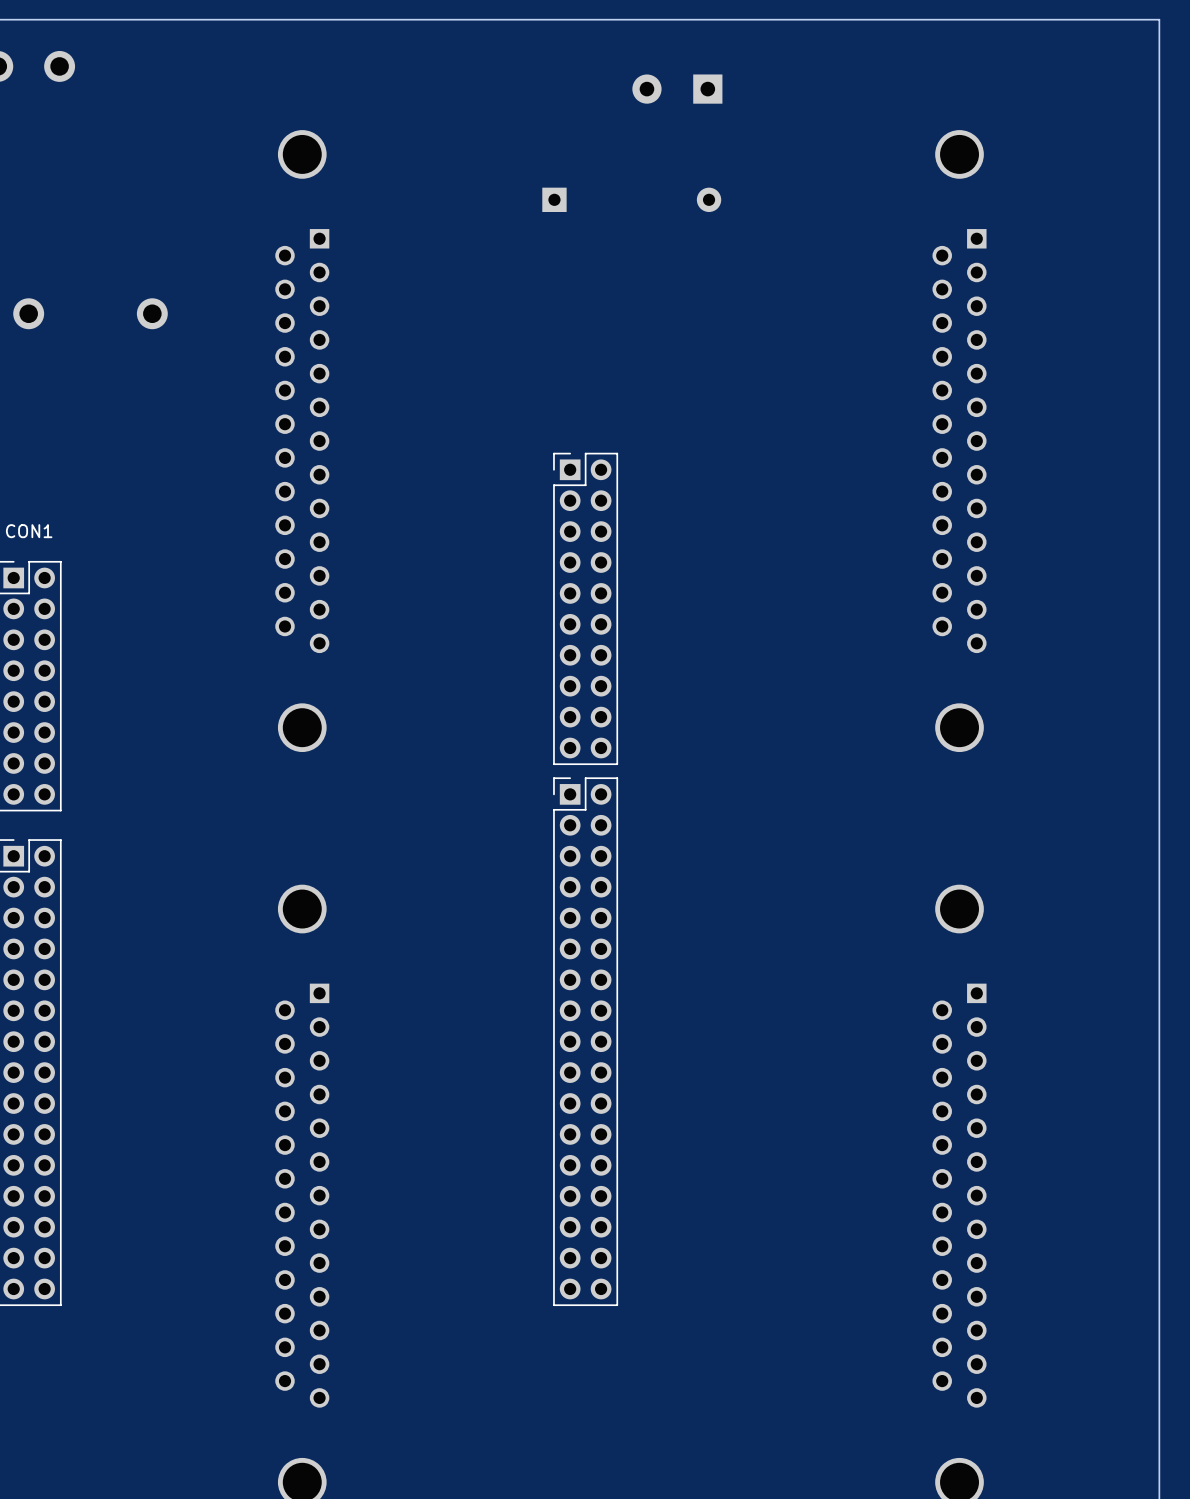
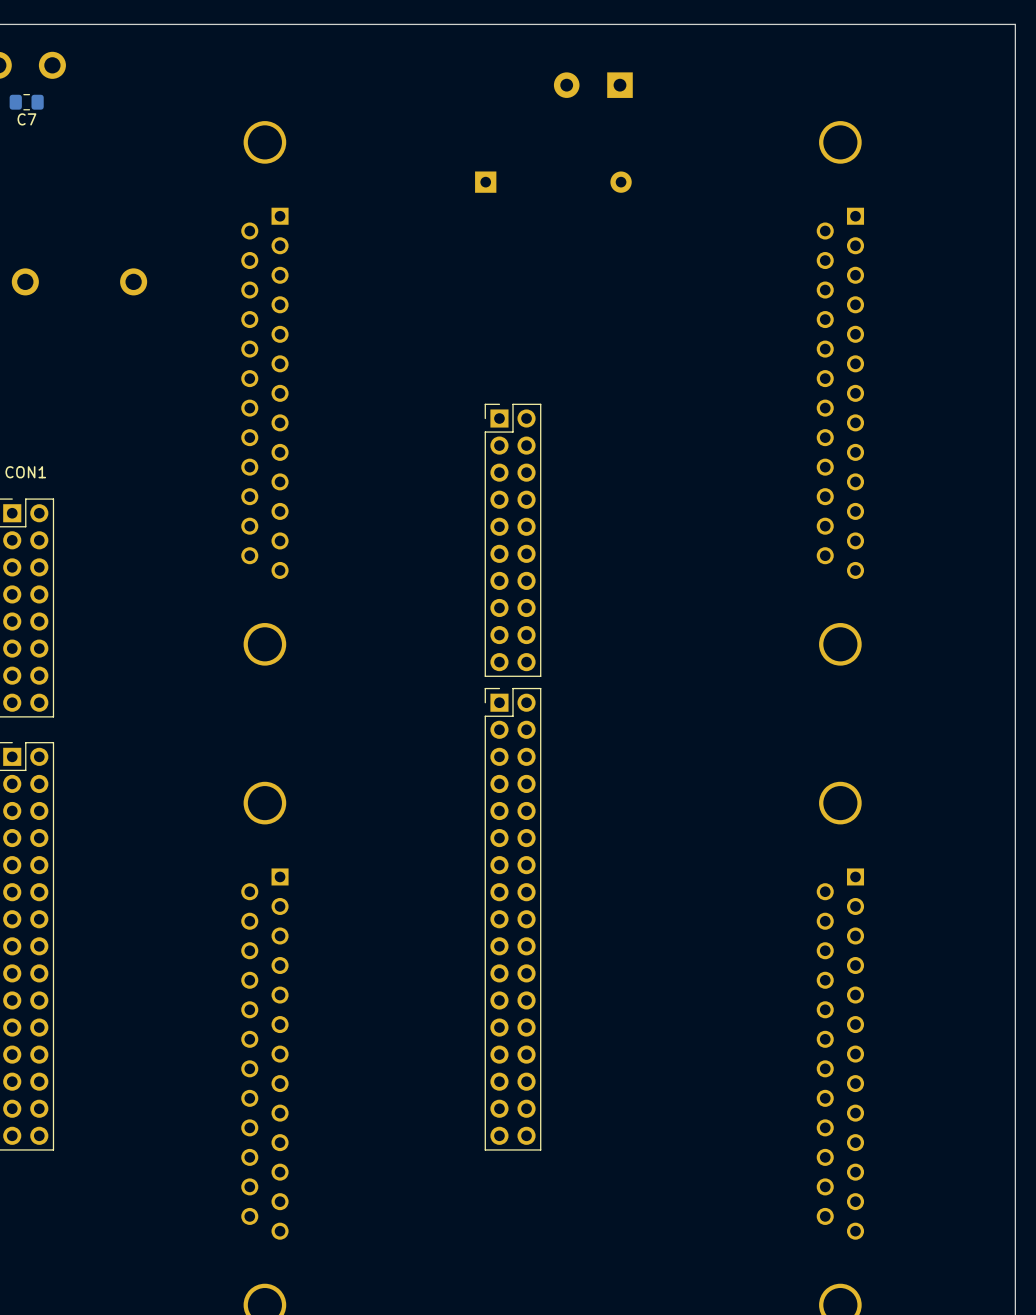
C7: none -> (26, 102)

